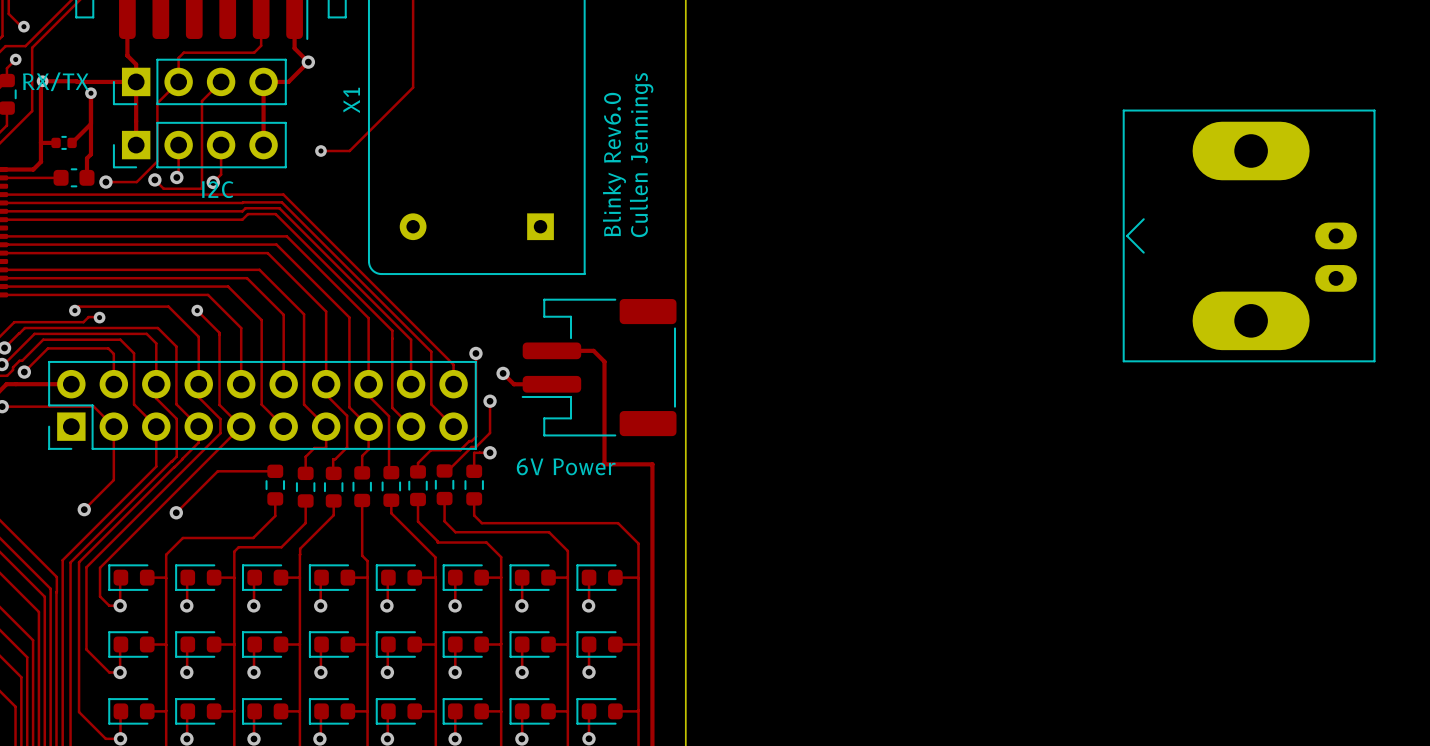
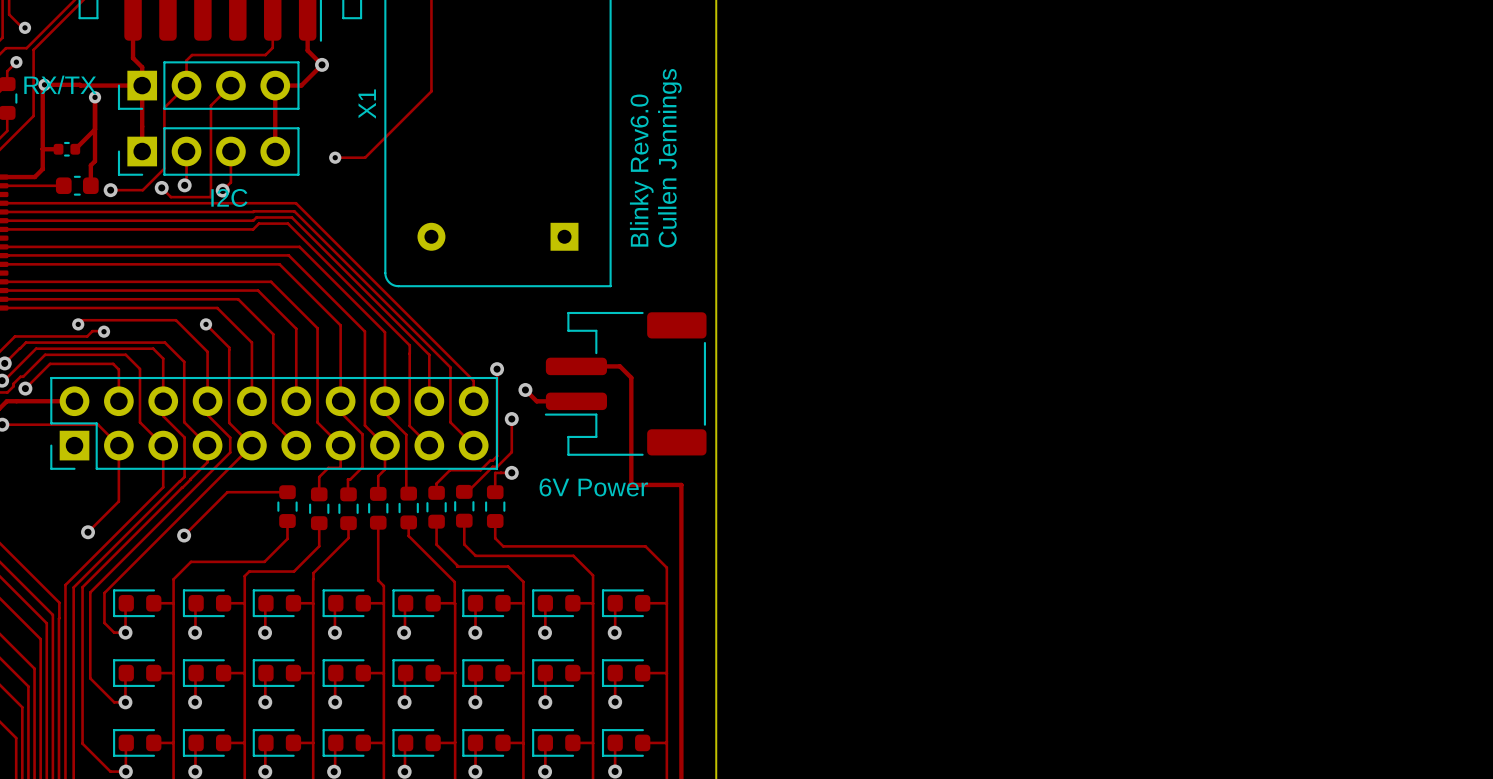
part: (1249, 235) -> none

